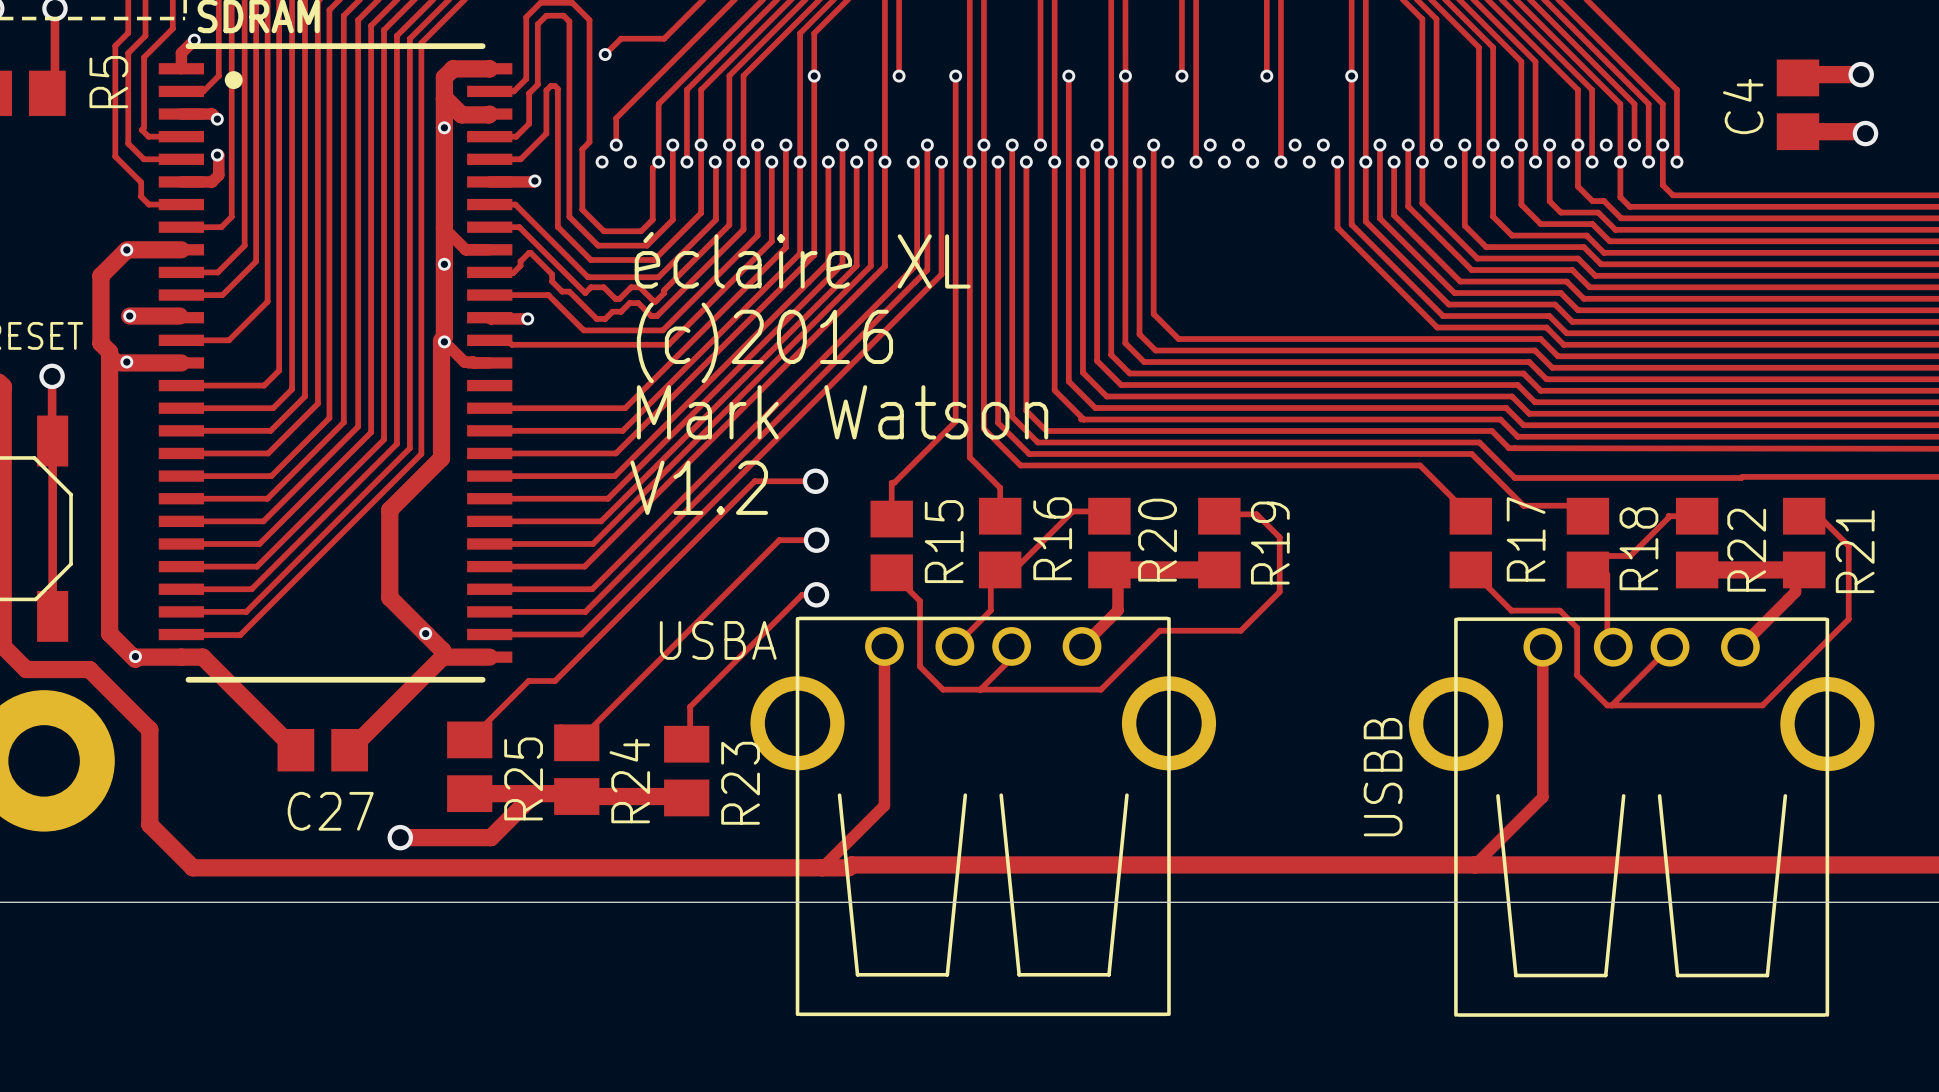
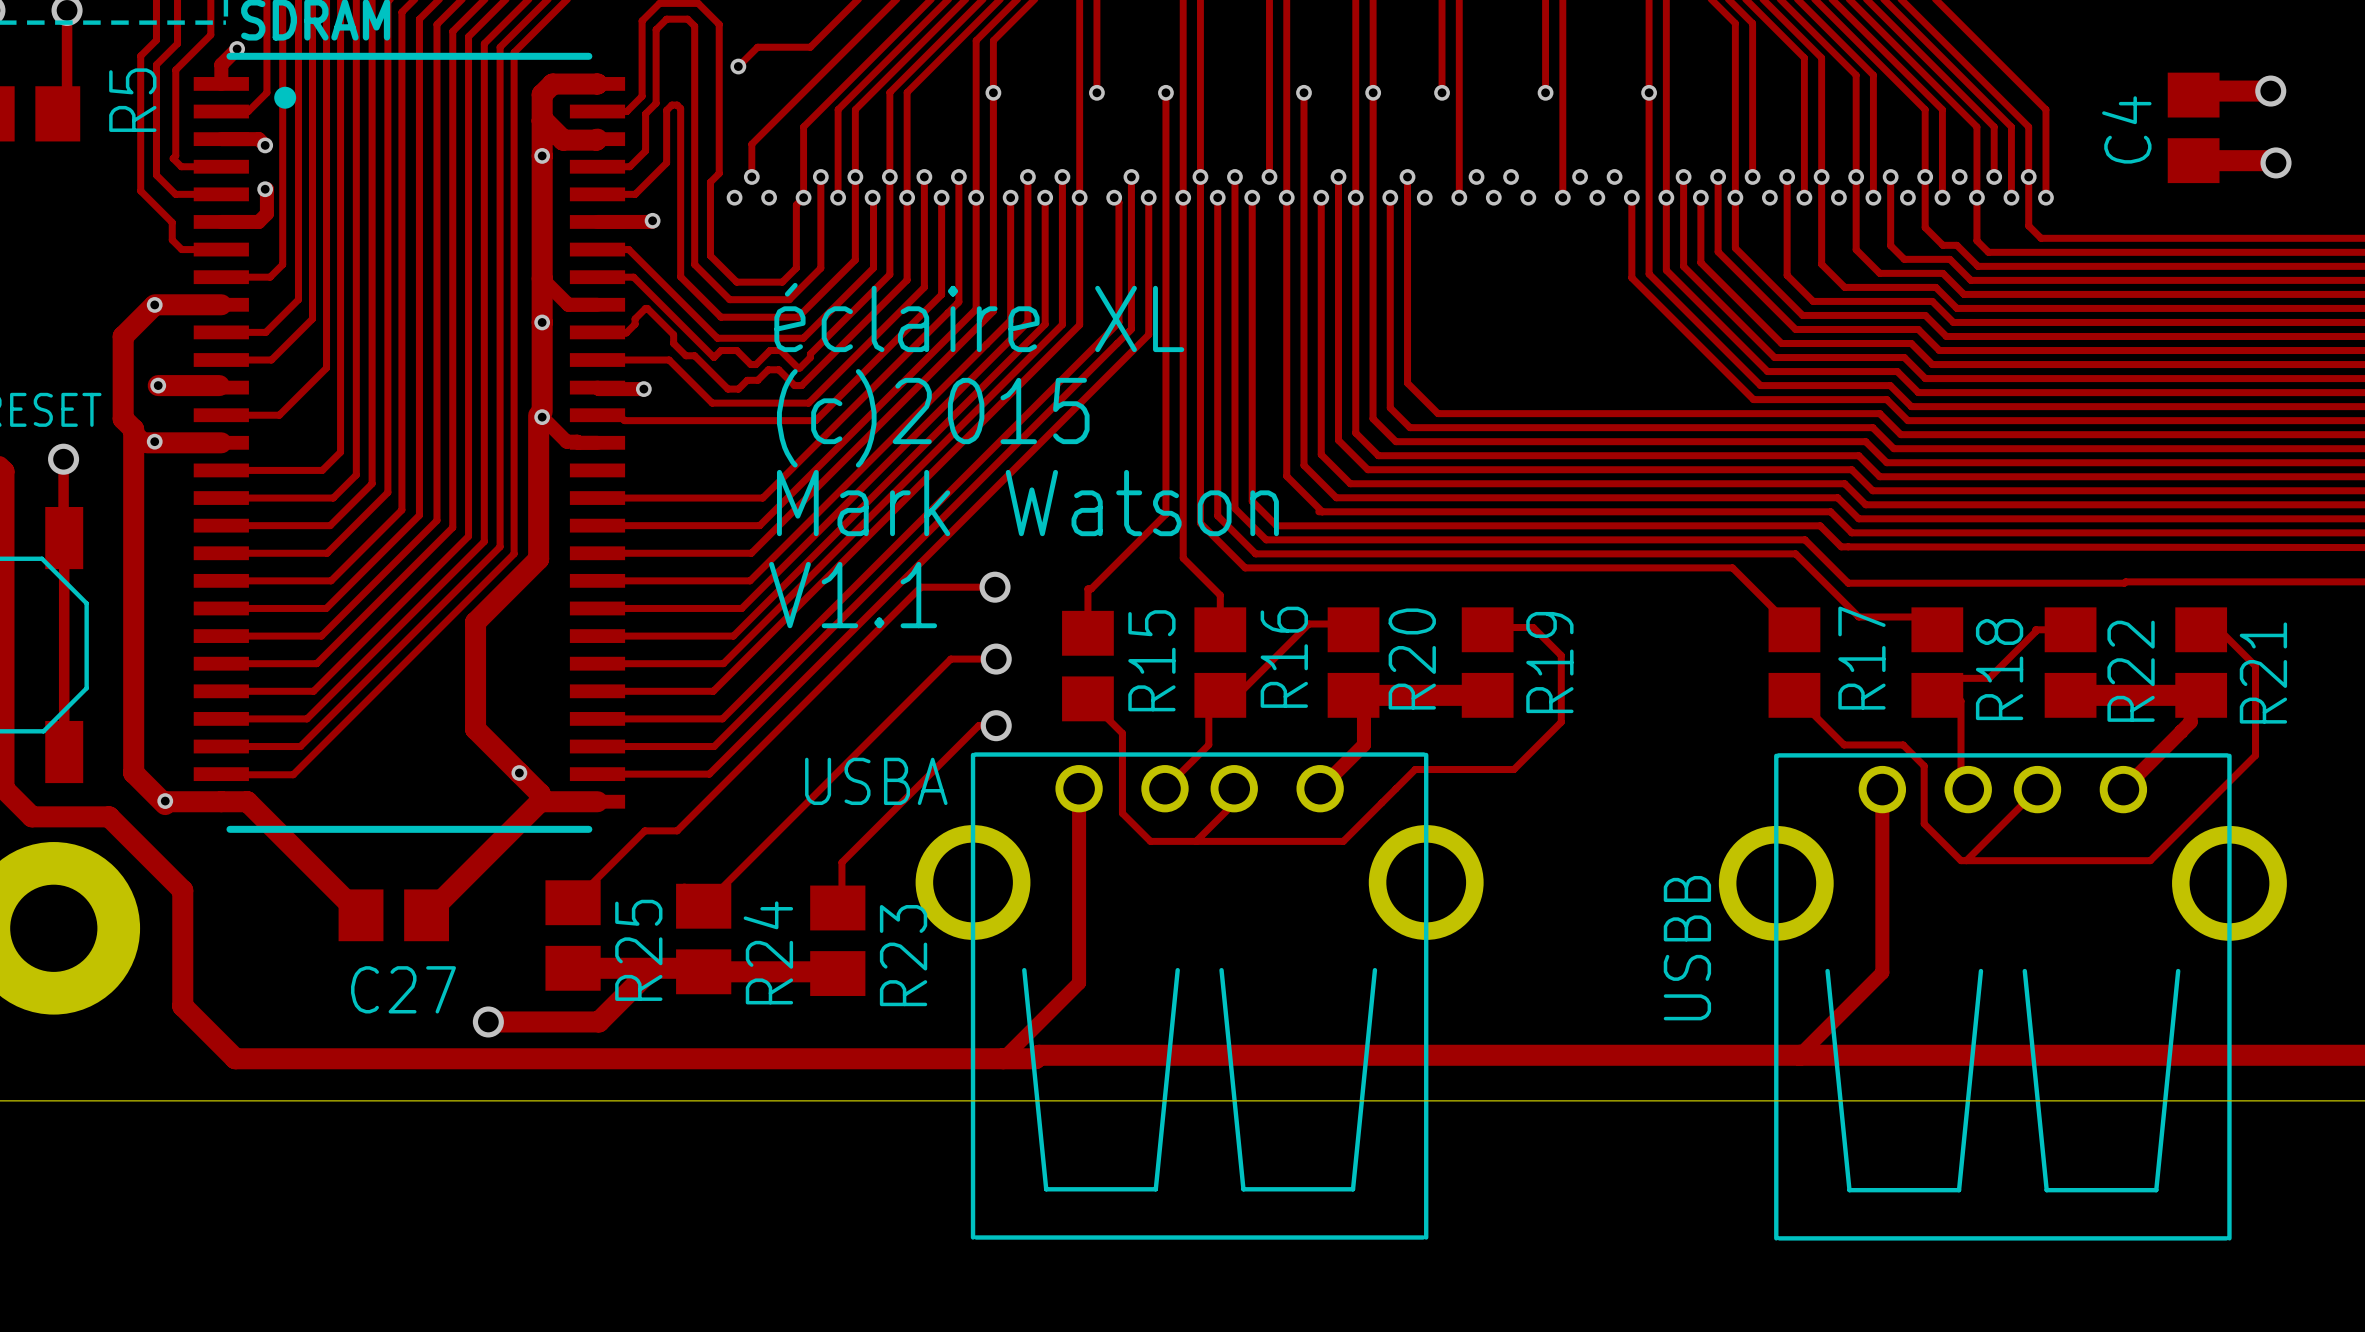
text: (c)2016 (764, 342) -> (c)2015 (933, 418)
text: V1.2 (699, 487) -> V1.1 (853, 595)

